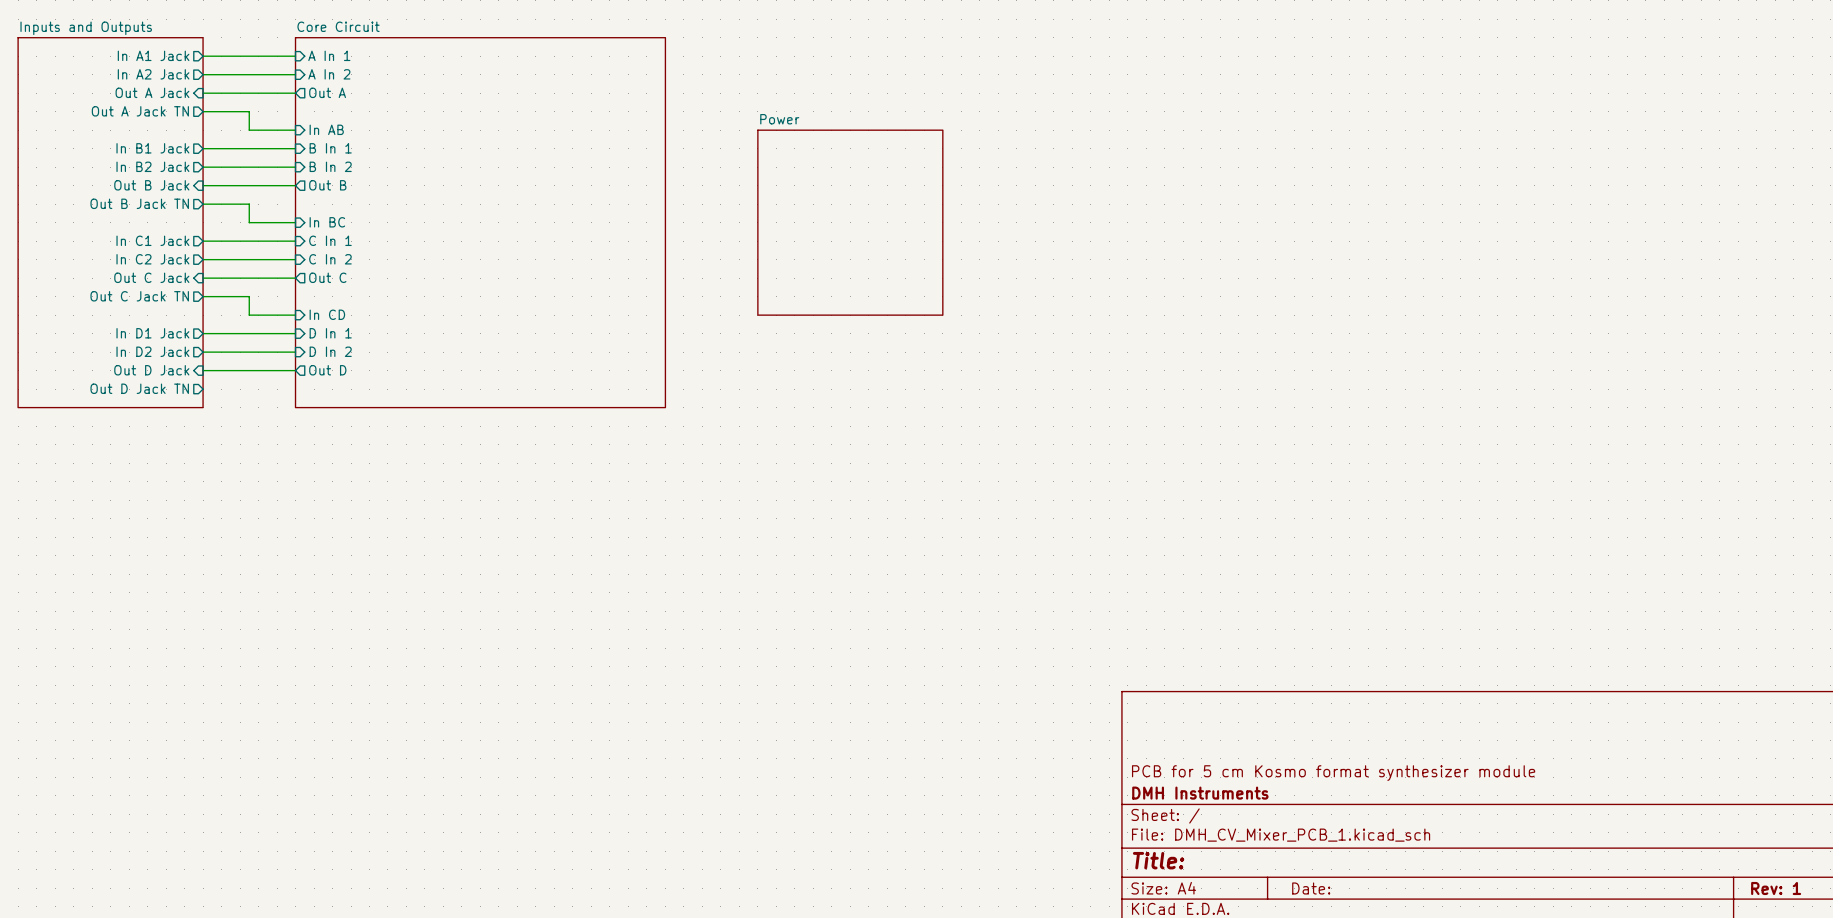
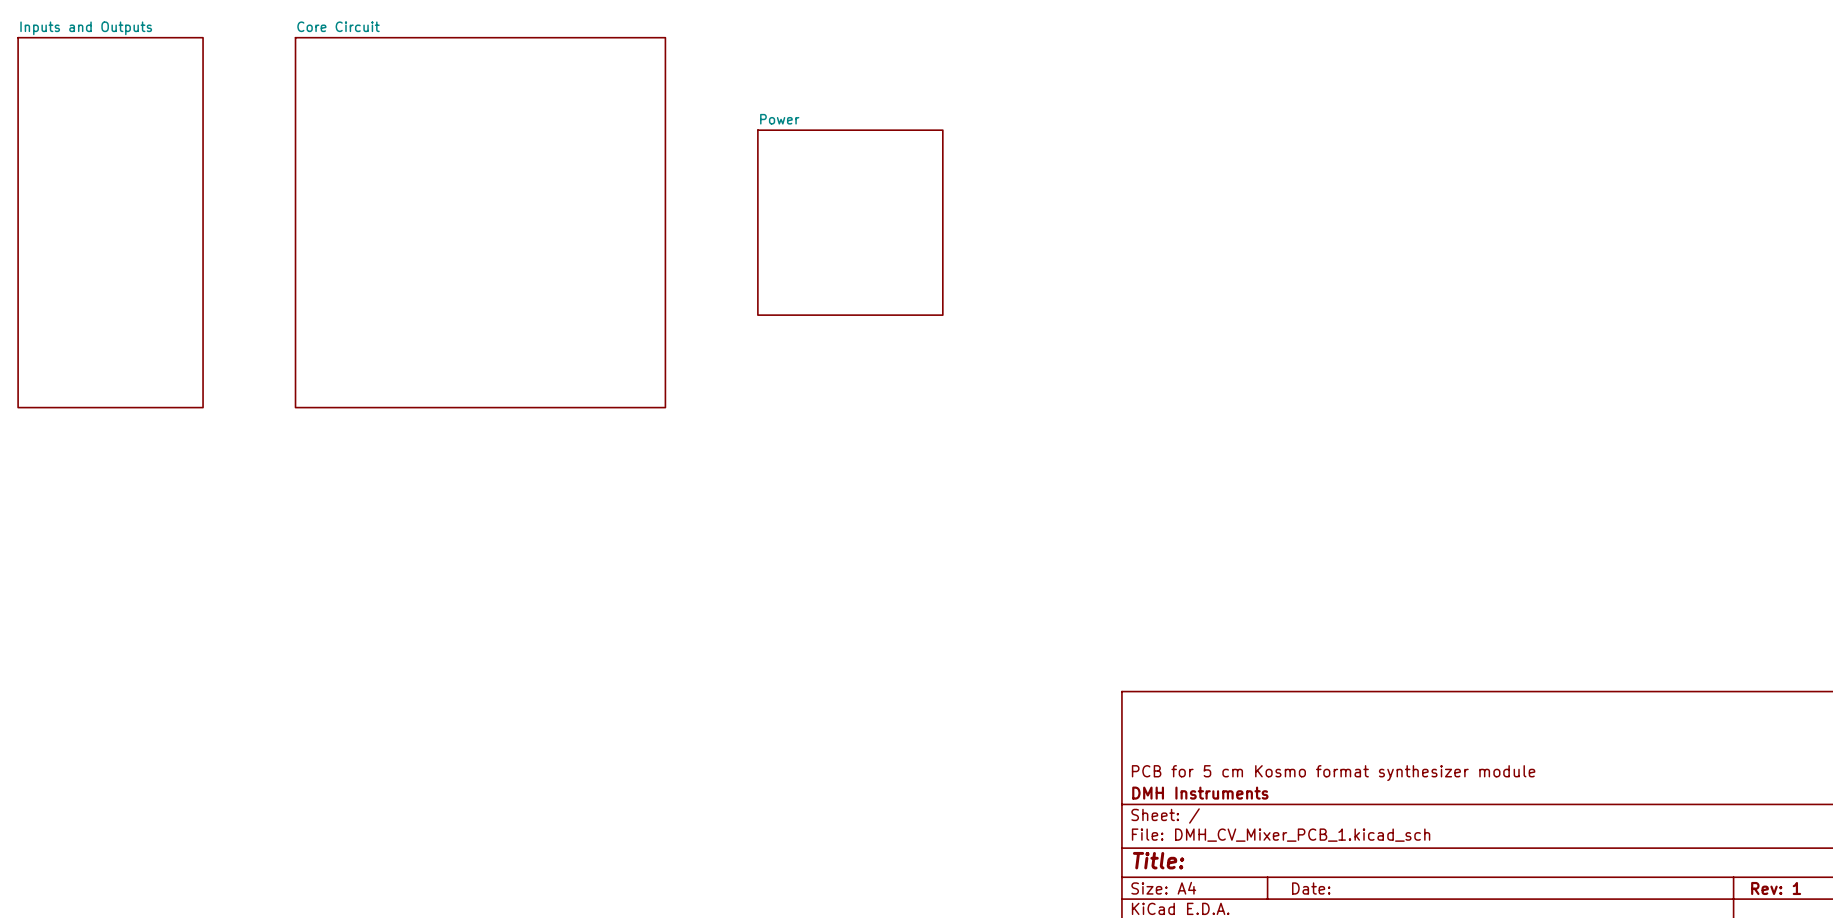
sheet pin: In A1 Jack (153, 55) -> none
sheet pin: A In 1 (329, 55) -> none
wire: (203, 56) (295, 56) -> none
sheet pin: In A2 Jack (153, 74) -> none
wire: (203, 74) (295, 74) -> none
sheet pin: A In 2 (329, 74) -> none
sheet pin: Out A Jack (152, 92) -> none
sheet pin: Out A (327, 92) -> none
wire: (203, 93) (295, 93) -> none
sheet pin: Out A Jack TN (140, 111) -> none
wire: (203, 111) (249, 111) (249, 130) (295, 130) -> none
sheet pin: In AB (326, 129) -> none
sheet pin: In B1 Jack (152, 148) -> none
wire: (203, 148) (295, 148) -> none
sheet pin: B In 1 (330, 148) -> none
sheet pin: In B2 Jack (152, 166) -> none
sheet pin: B In 2 (330, 166) -> none
wire: (203, 167) (295, 167) -> none
sheet pin: Out B Jack (151, 185) -> none
wire: (203, 185) (295, 185) -> none
sheet pin: Out B (327, 185) -> none
sheet pin: Out B Jack TN (139, 203) -> none
wire: (203, 204) (249, 204) (249, 222) (295, 222) -> none
sheet pin: In BC (327, 222) -> none
sheet pin: In C1 Jack (152, 240) -> none
sheet pin: C In 1 (330, 240) -> none
wire: (203, 241) (295, 241) -> none
sheet pin: In C2 Jack (152, 259) -> none
wire: (203, 259) (295, 259) -> none
sheet pin: C In 2 (330, 259) -> none
sheet pin: Out C Jack (151, 277) -> none
sheet pin: Out C (327, 277) -> none
wire: (203, 278) (295, 278) -> none
sheet pin: Out C Jack TN (139, 296) -> none
wire: (203, 296) (249, 296) (249, 315) (295, 315) -> none
sheet pin: In CD (327, 314) -> none
sheet pin: In D1 Jack (152, 333) -> none
wire: (203, 333) (295, 333) -> none
sheet pin: D In 1 (330, 333) -> none
sheet pin: In D2 Jack (152, 351) -> none
sheet pin: D In 2 (330, 351) -> none
wire: (203, 352) (295, 352) -> none
sheet pin: Out D Jack (151, 370) -> none
wire: (203, 370) (295, 370) -> none
sheet pin: Out D (327, 370) -> none
sheet pin: Out D Jack TN (139, 388) -> none

